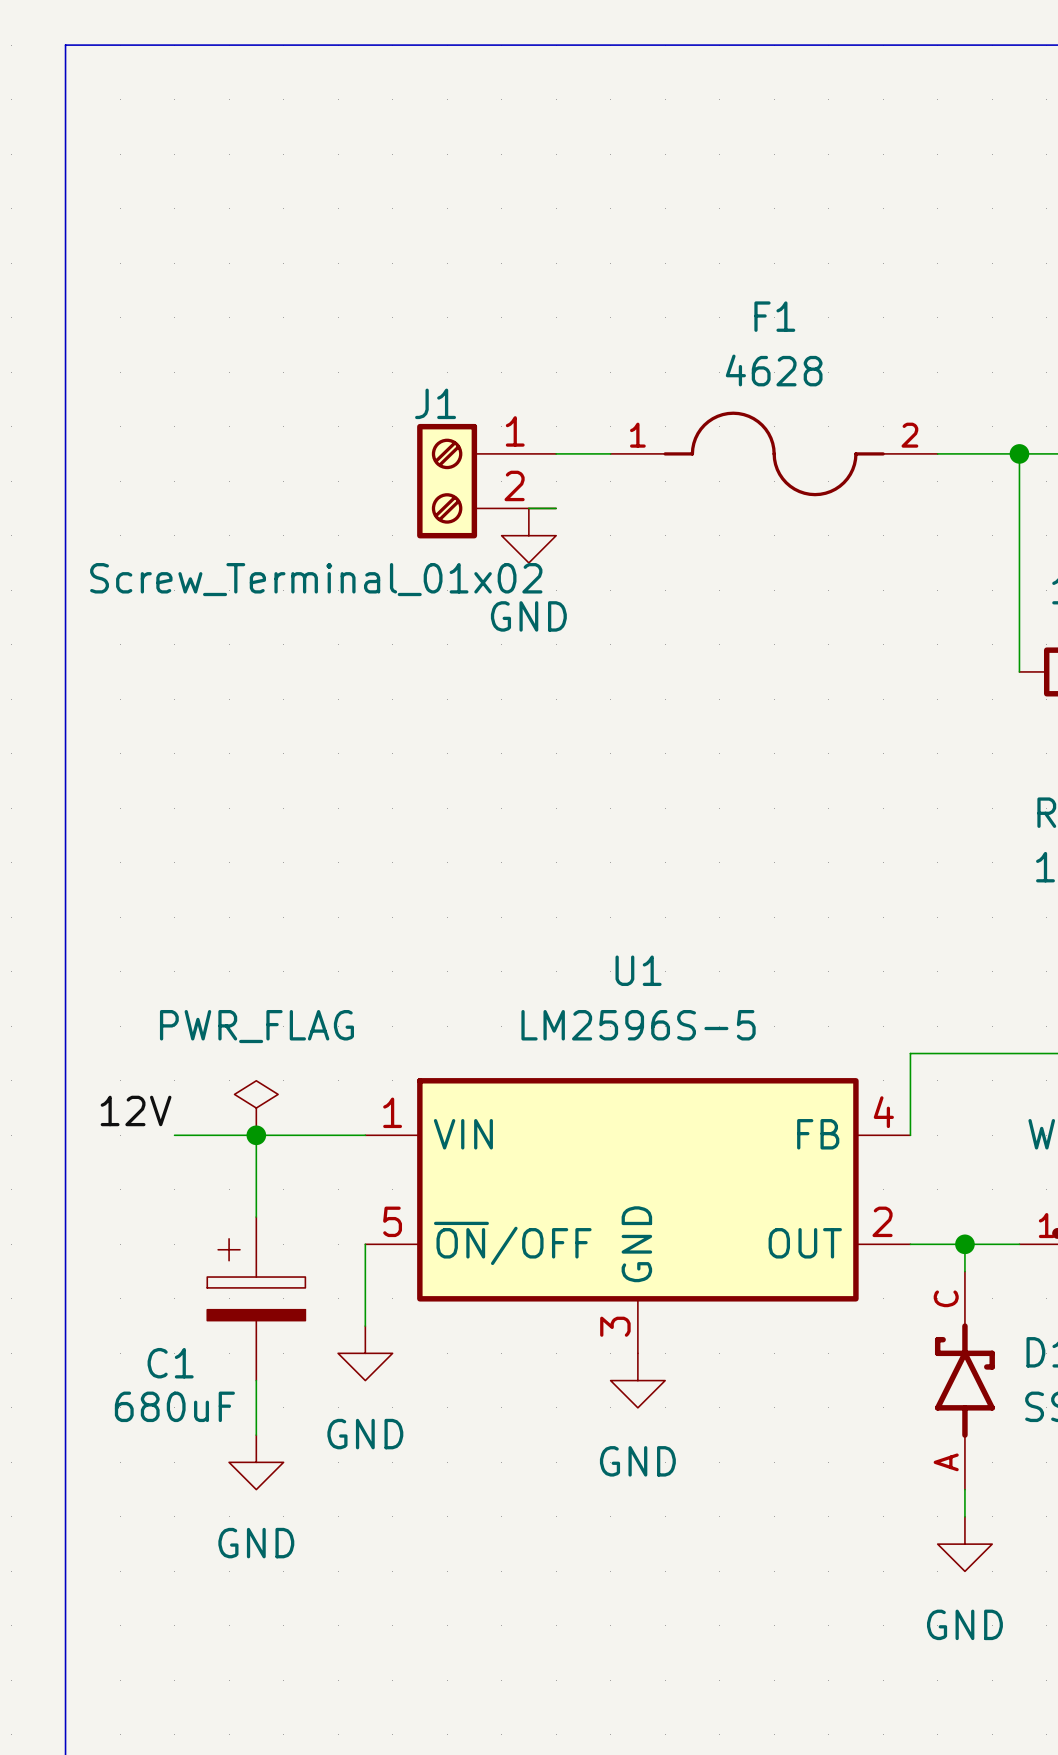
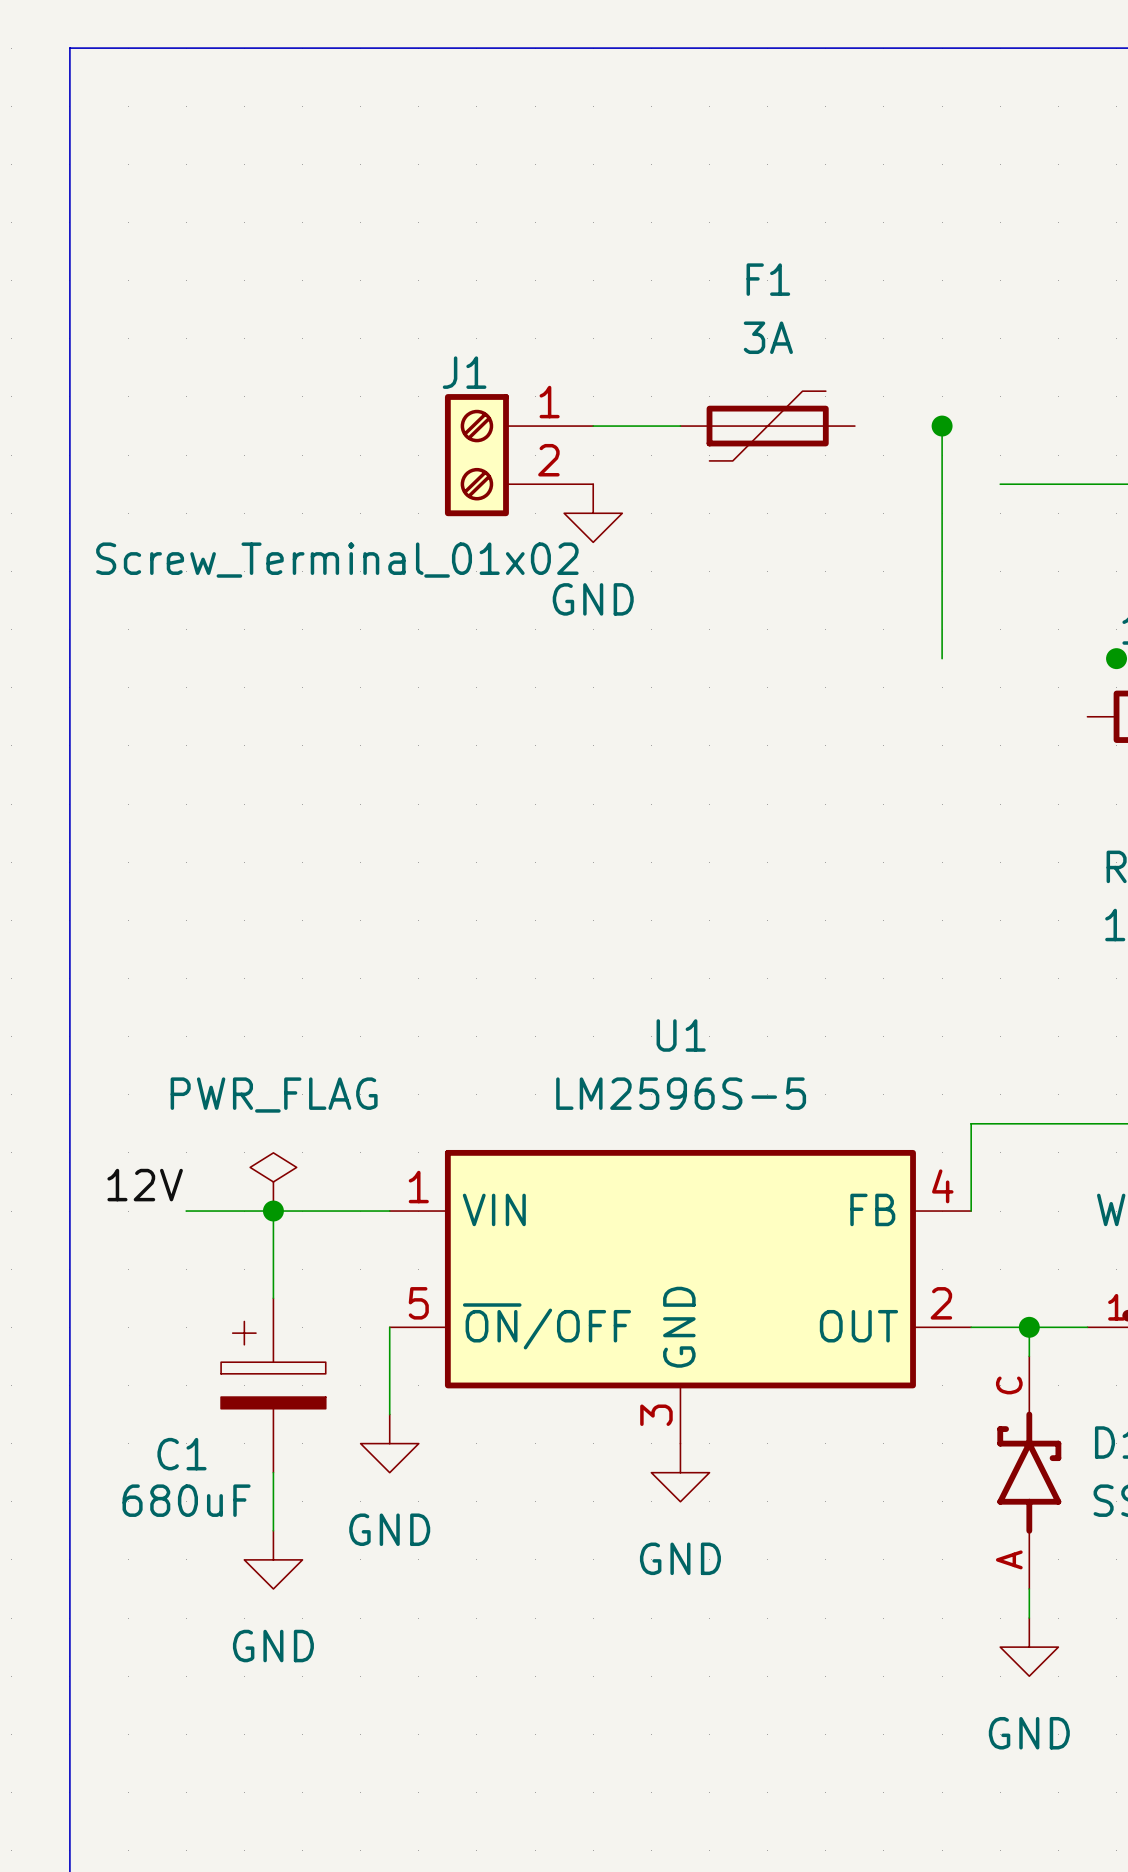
F1 value: 4628 (774, 370) -> 3A (768, 337)
wire: none -> (593, 426) (680, 426)
junction: none -> (942, 426)
F1 symbol: [610, 411, 938, 497] -> [680, 391, 855, 461]
wire: (556, 453) (610, 453) -> none
wire: (1019, 453) (1019, 671) -> (942, 426) (942, 658)
junction: (1019, 453) -> none
J1 position: (486, 481) -> (519, 455)
wire: (528, 508) (556, 508) -> none
power symbol position: GND (528, 535) -> GND (593, 513)
junction: none -> (1116, 658)

